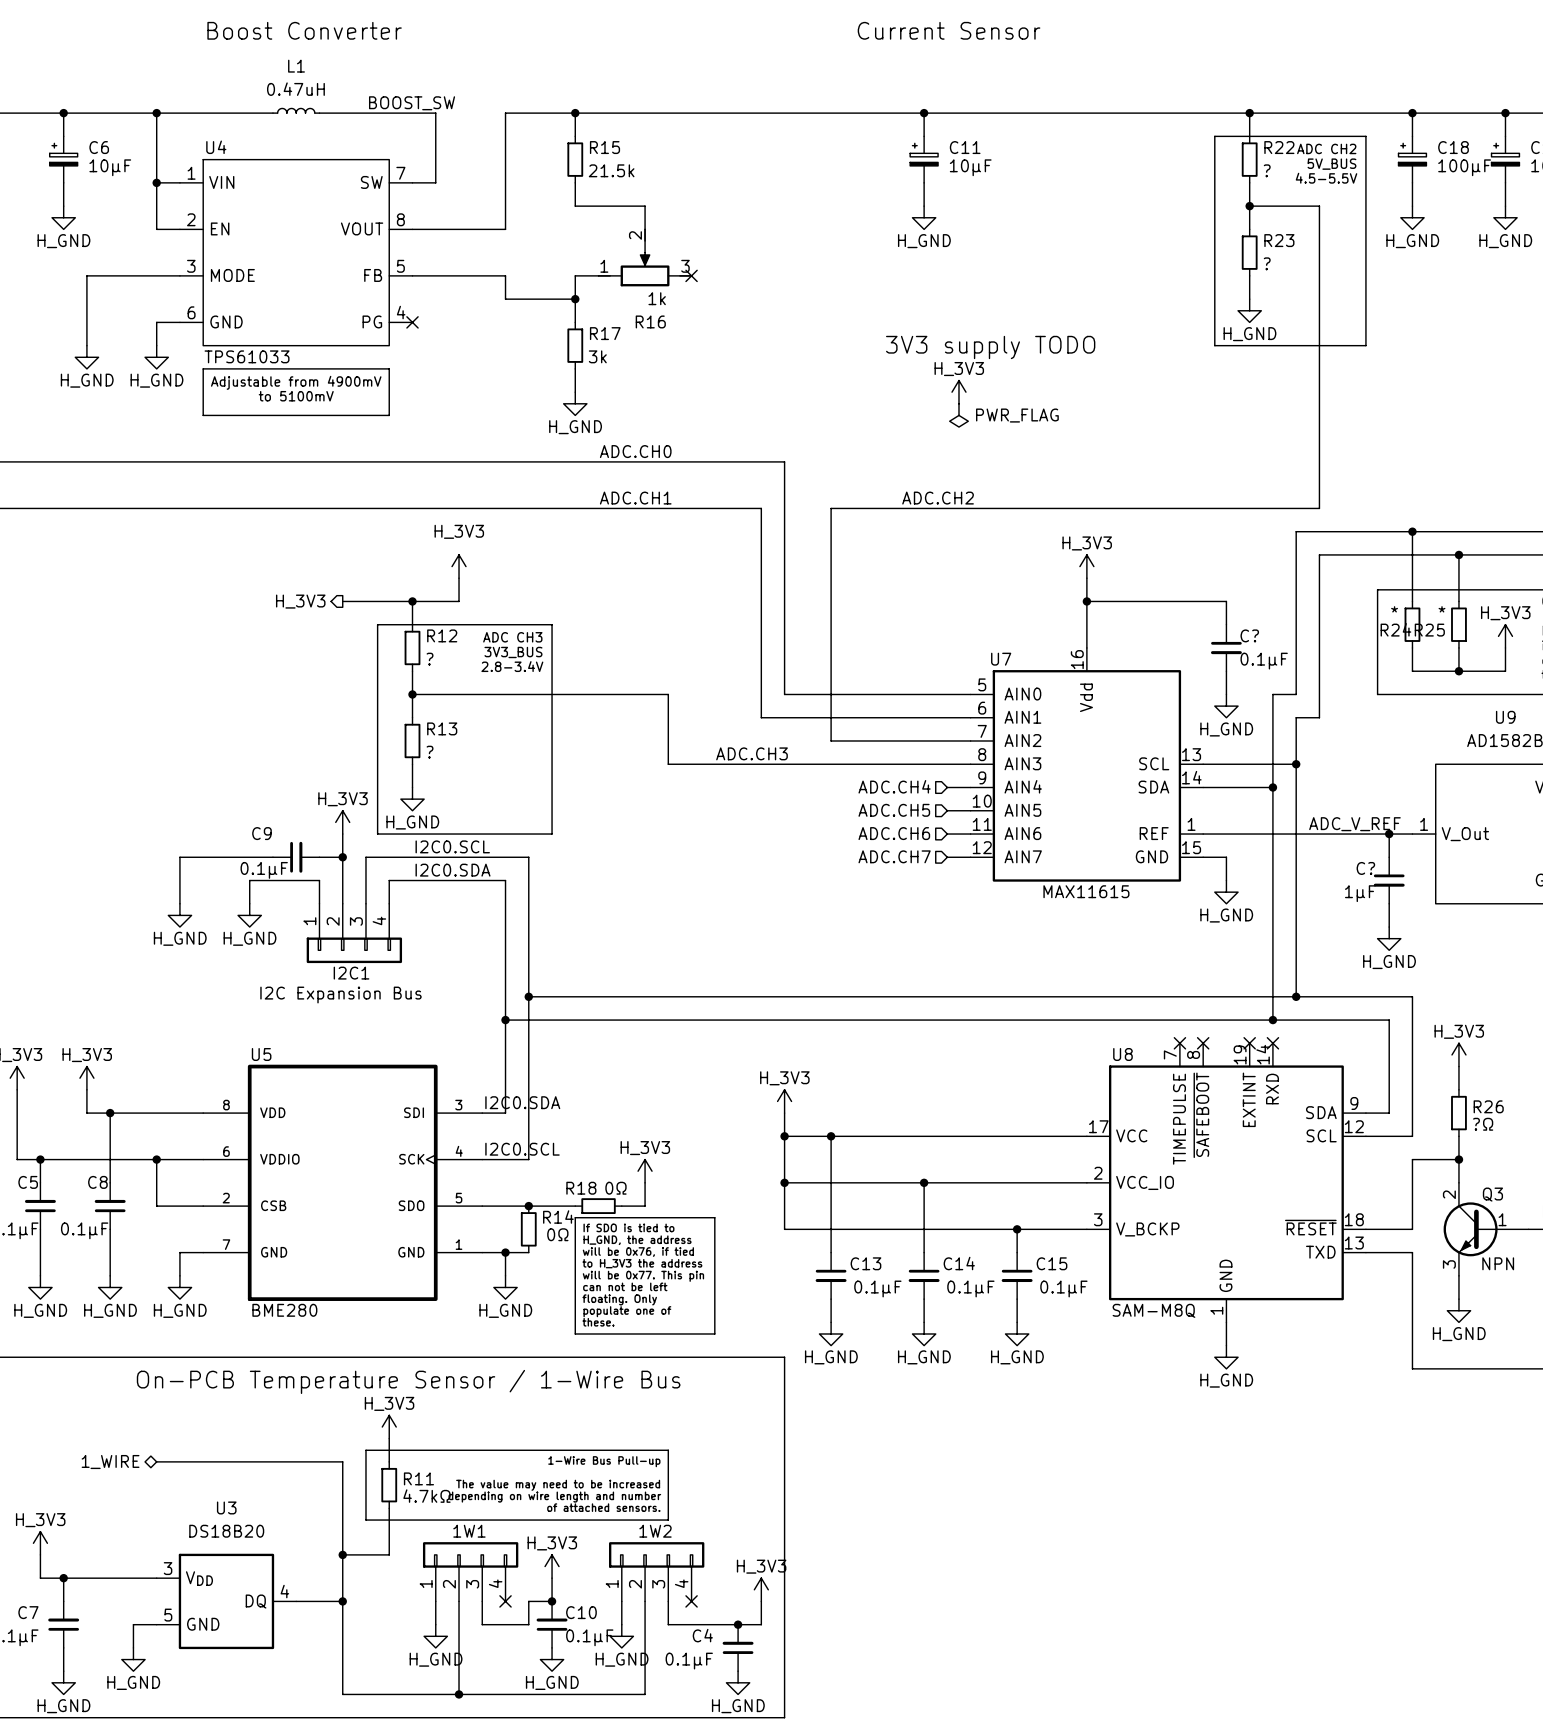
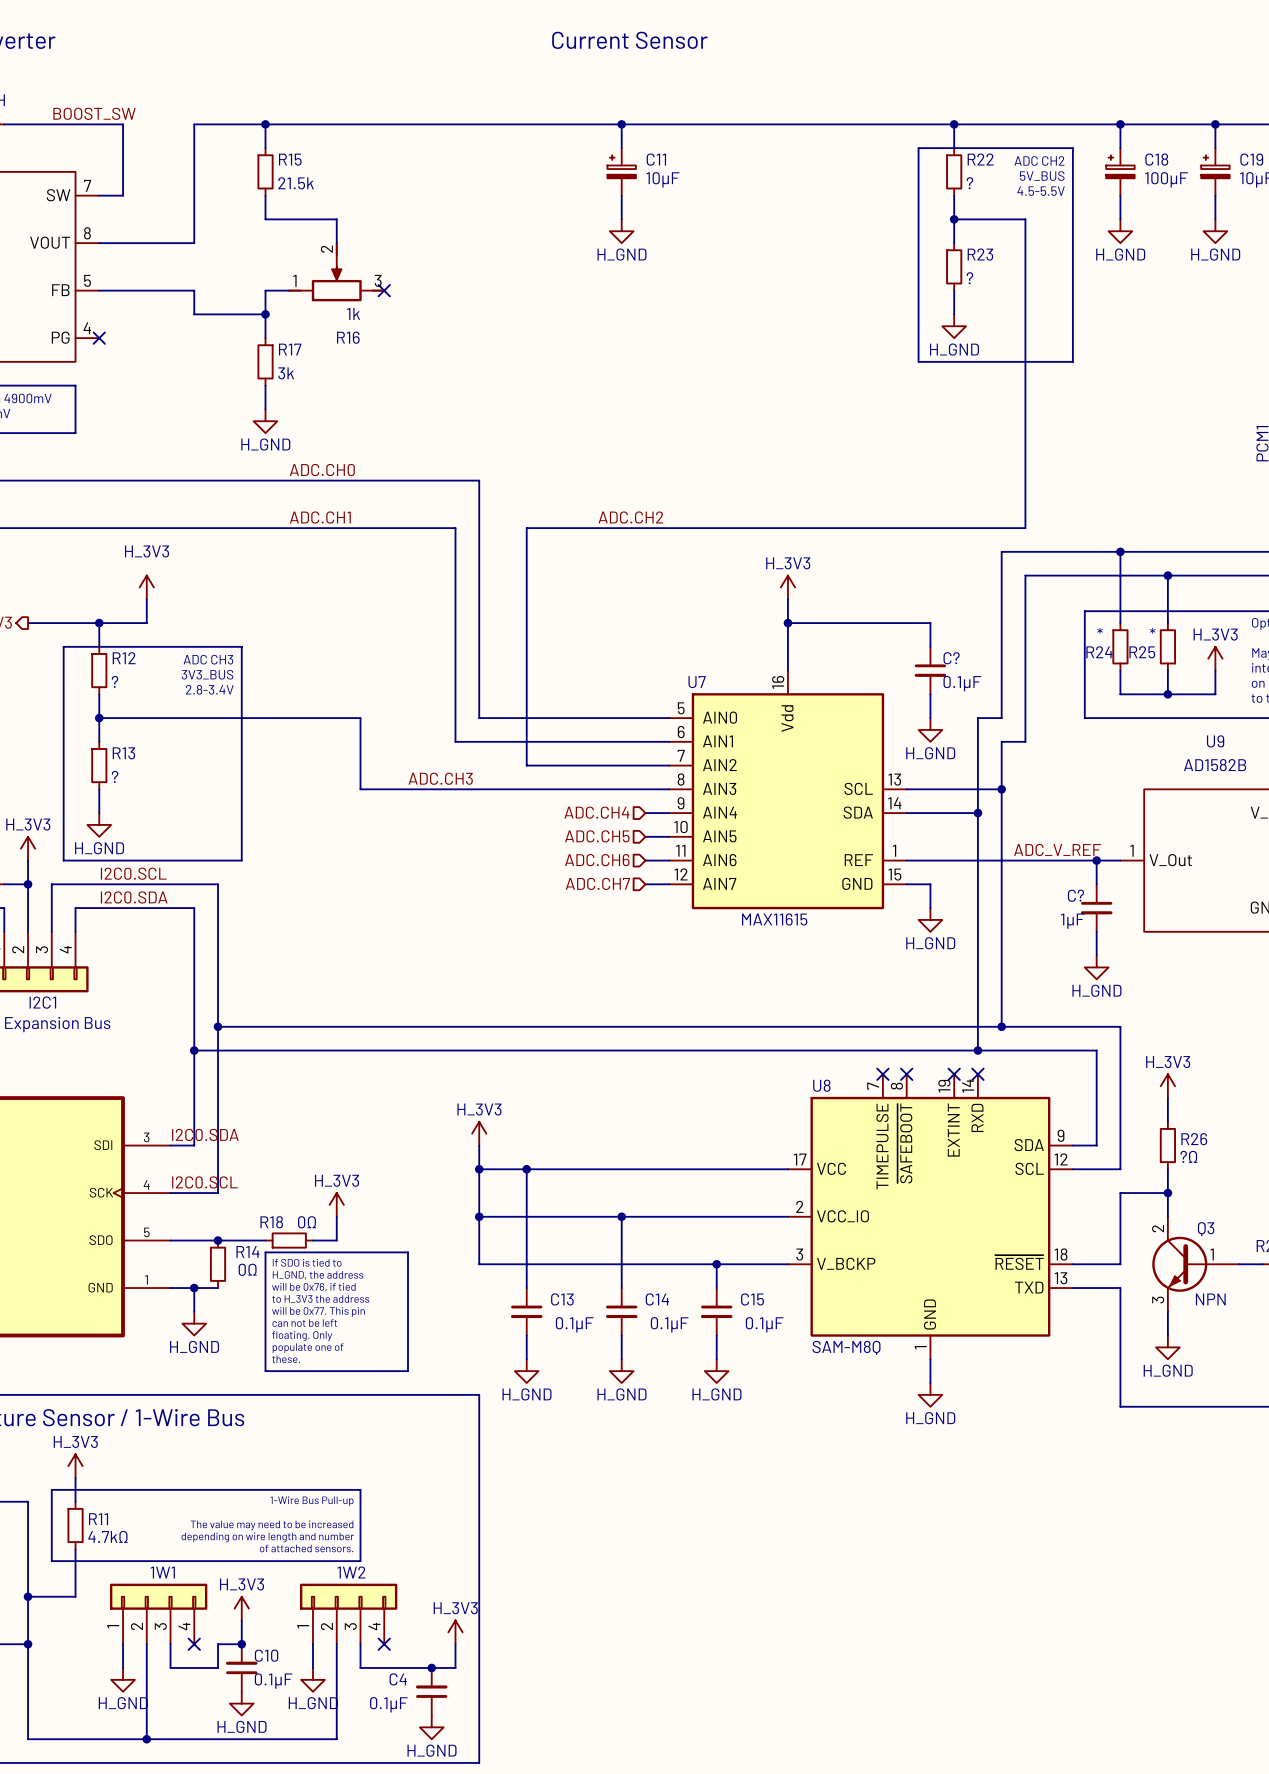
text: 3V3 supply TODO (990, 347) -> none
power symbol: H_3V3 (958, 392) -> none
power symbol: PWR_FLAG (958, 415) -> none

